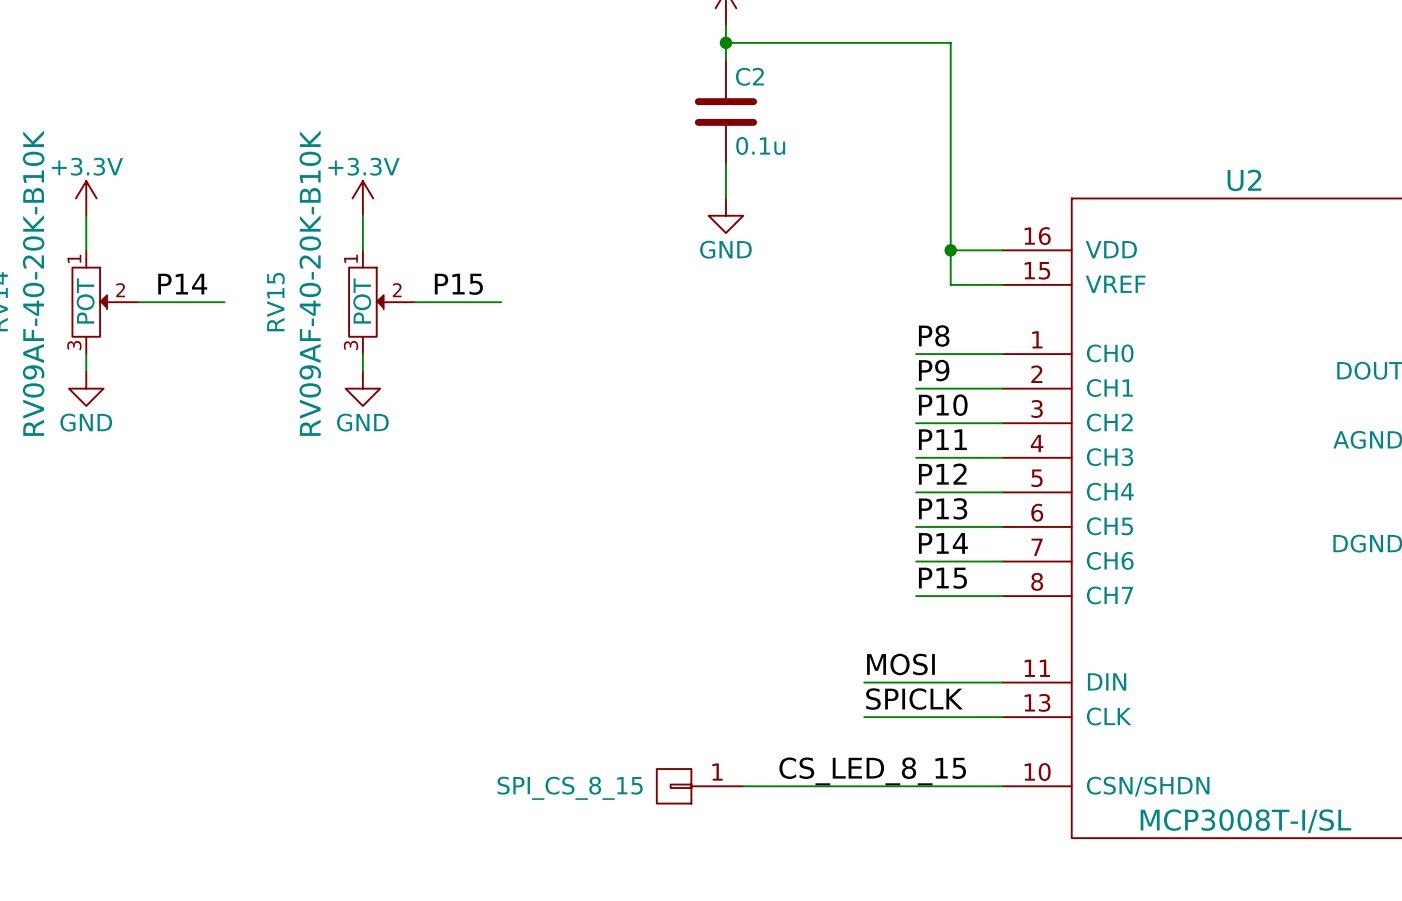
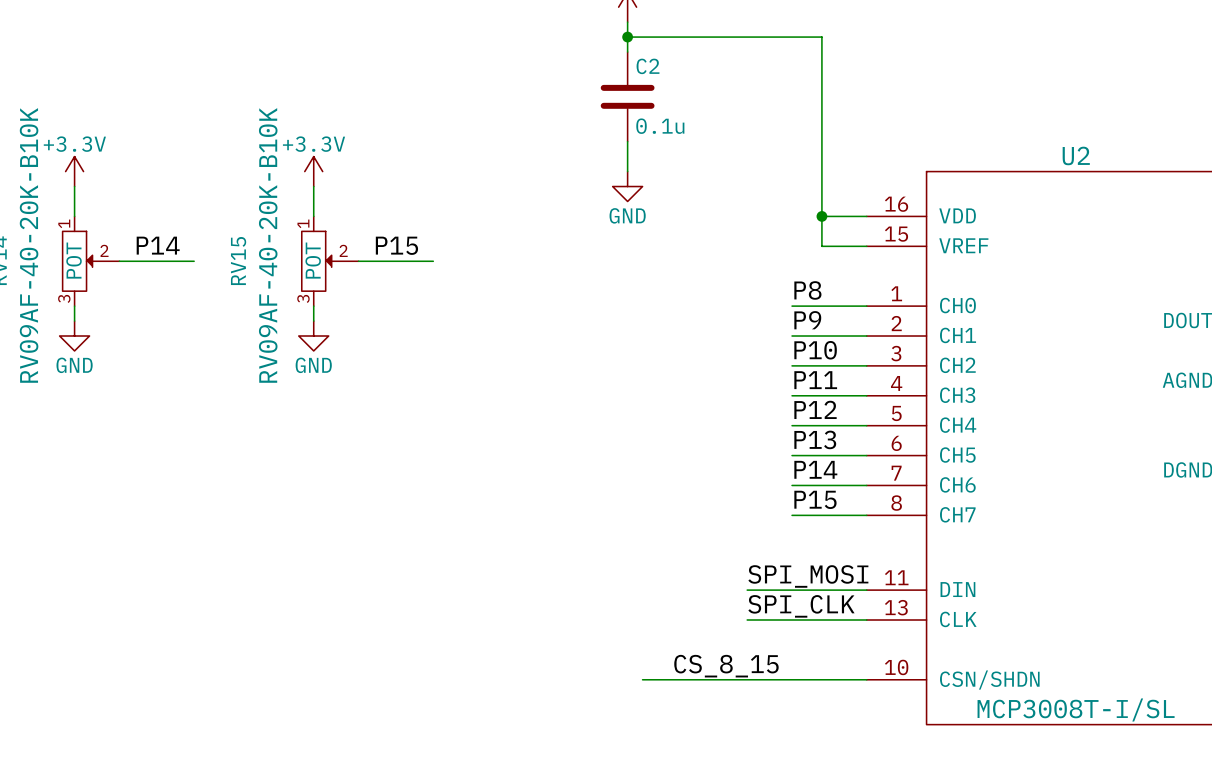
label: MOSI (900, 664) -> SPI_MOSI (808, 576)
label: SPICLK (914, 699) -> SPI_CLK (801, 606)
label: CS_LED_8_15 (872, 771) -> CS_8_15 (726, 666)
SPI_CS_8_15: (700, 786) -> none

